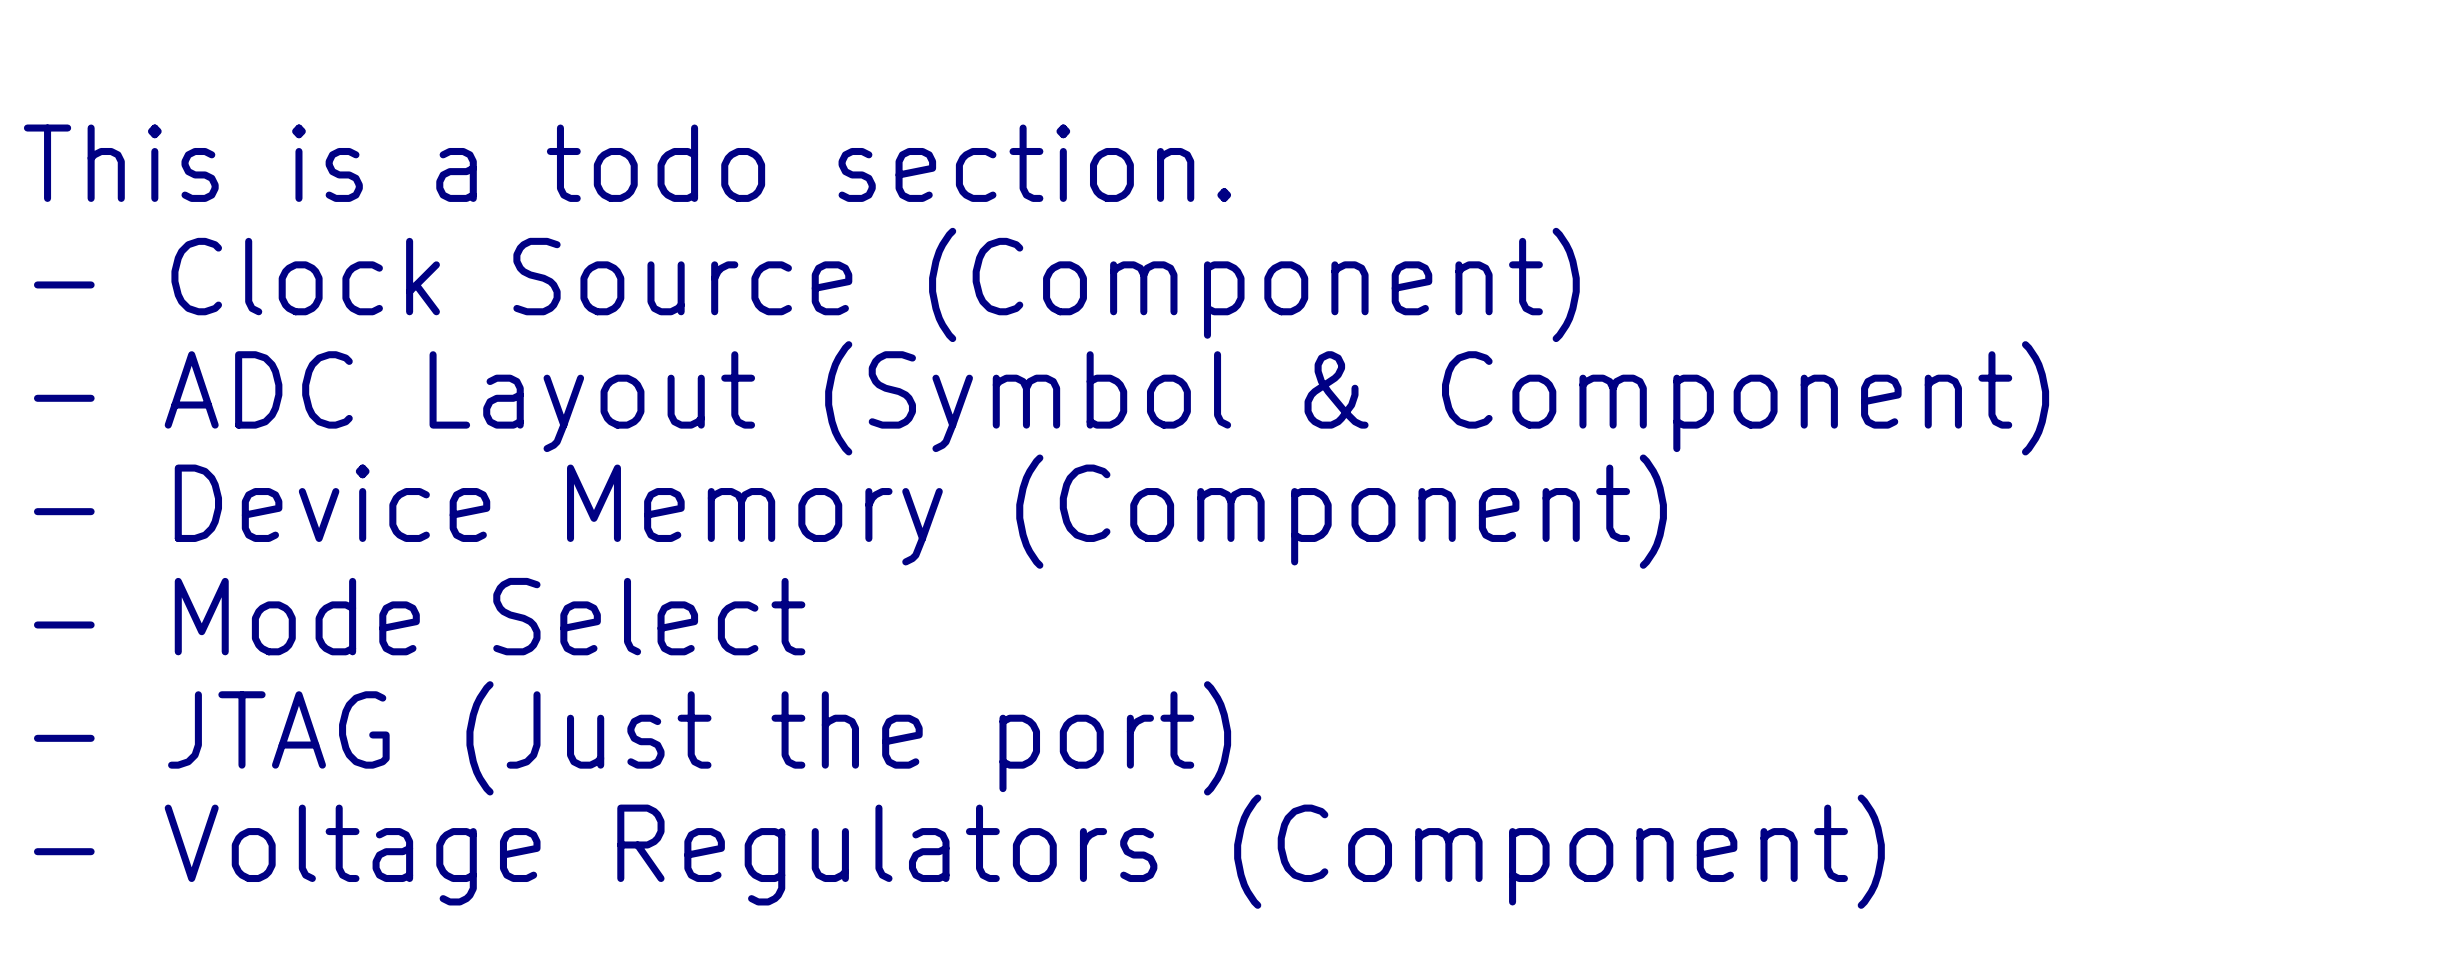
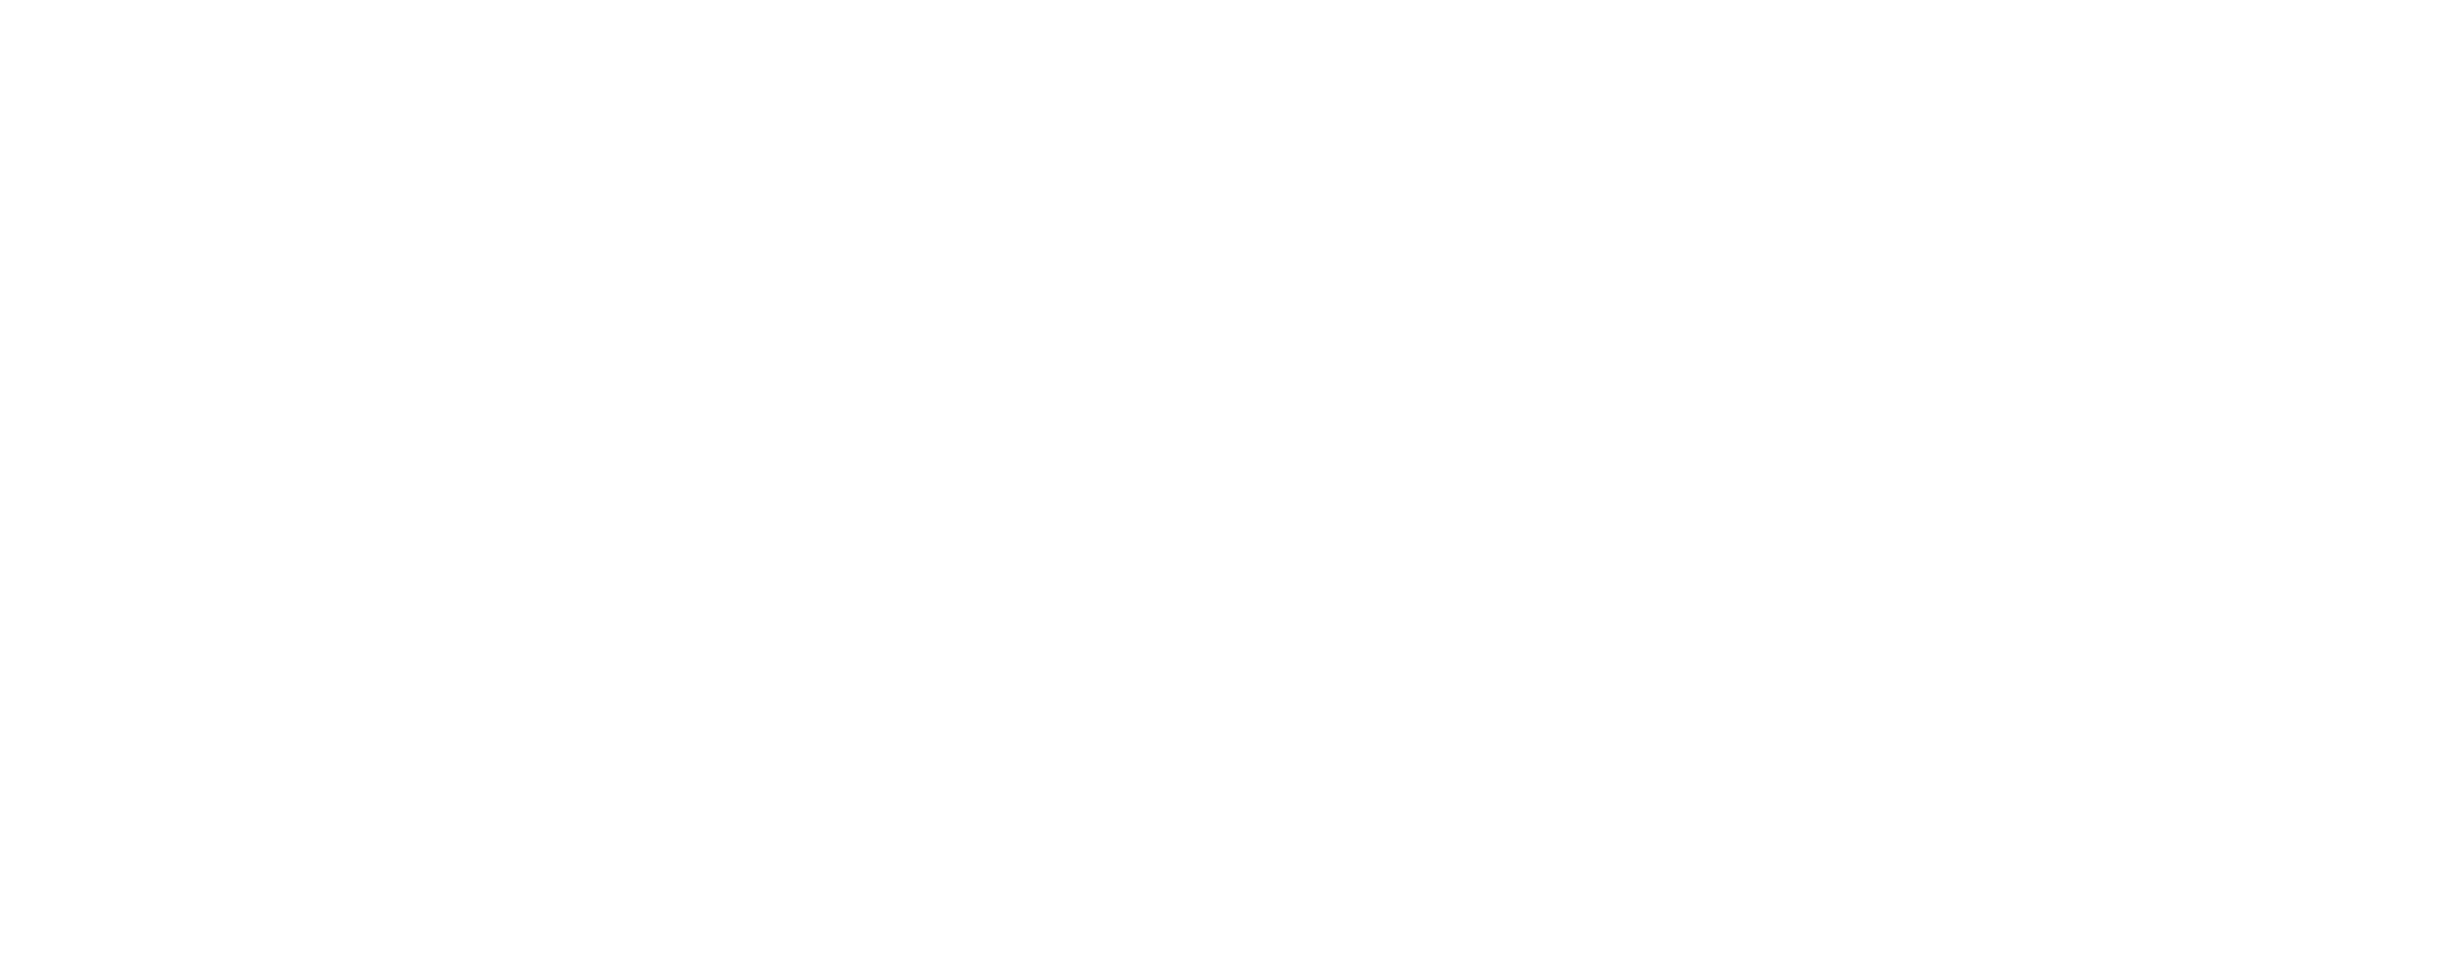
text: This is a todo section. (627, 163) -> none
text: - Clock Source (Component) (806, 284) -> none
text: - ADC Layout (Symbol & Component) (1041, 398) -> none
text: - Device Memory (Component) (850, 511) -> none
text: - Mode Select (419, 616) -> none
text: - JTAG (Just the port) (632, 738) -> none
text: - Voltage Regulators (Component) (959, 851) -> none

